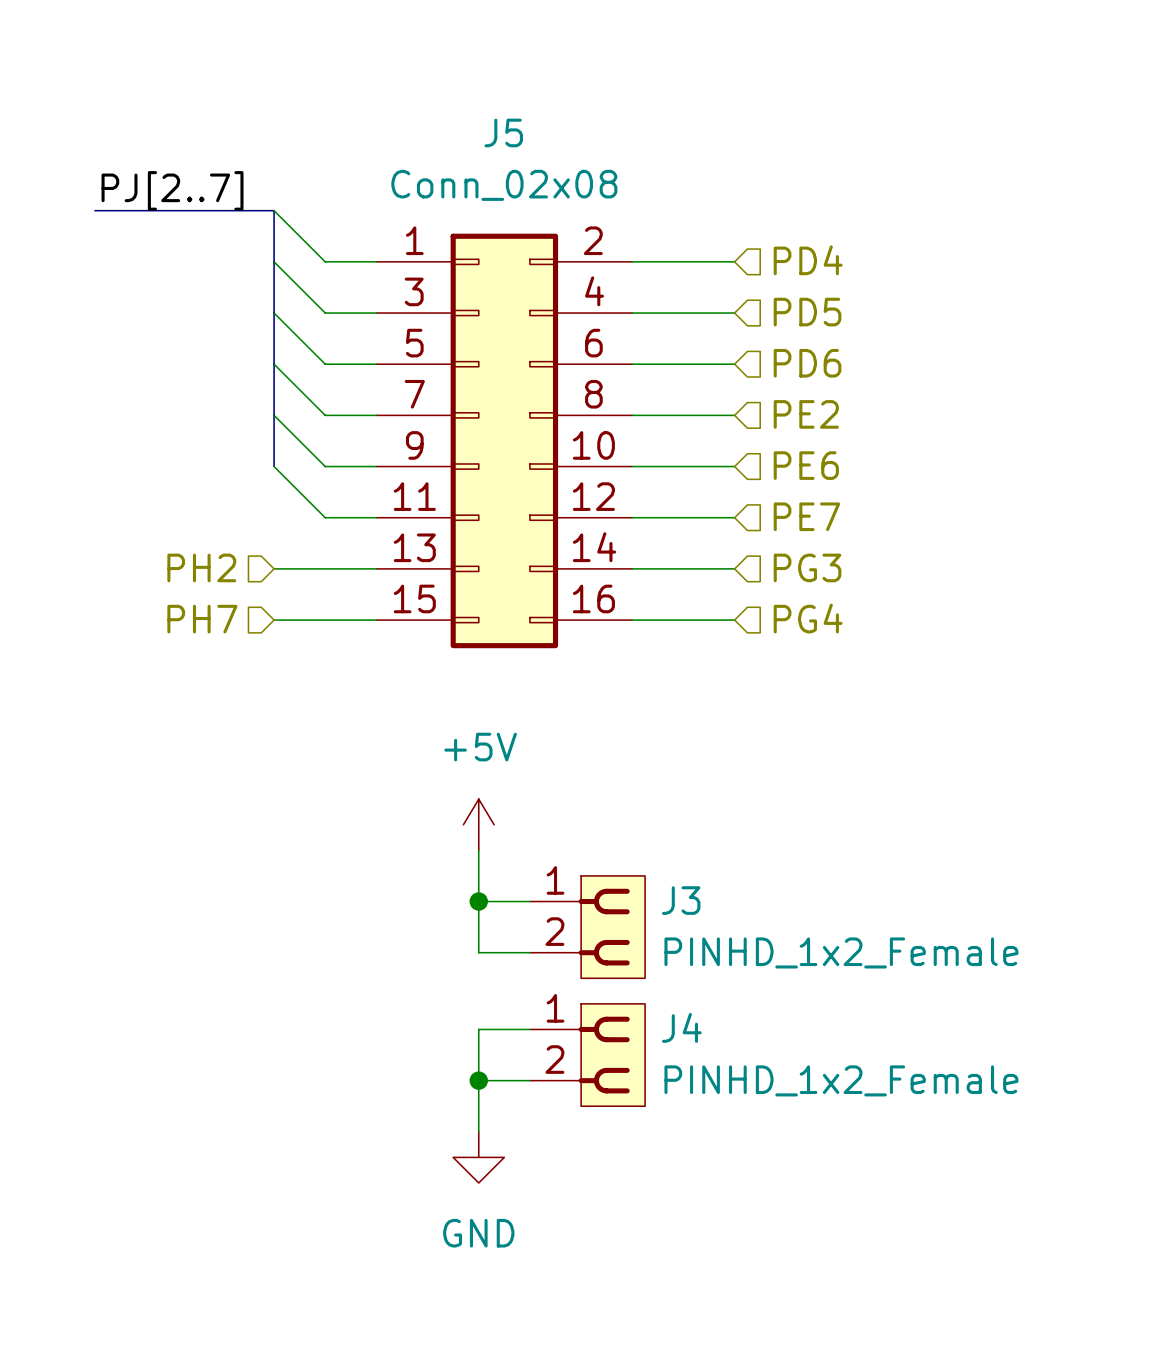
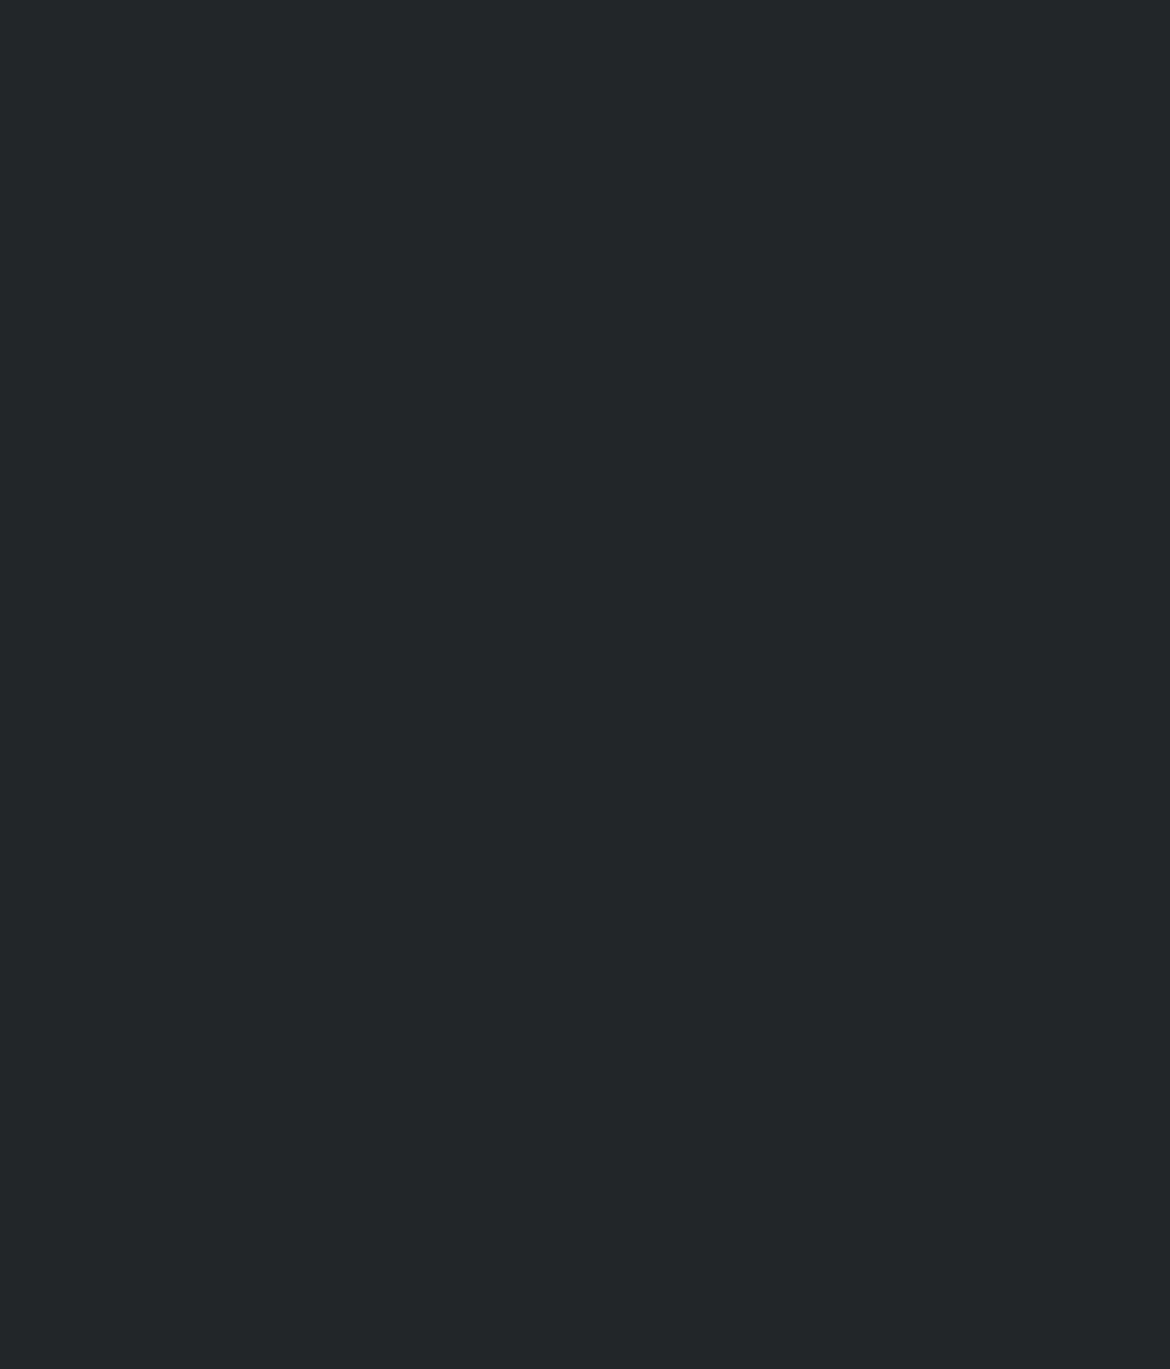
label: PJ[2..7] (172, 190) -> none
bus: (94, 210) (274, 210) (274, 466) -> none
wire: (274, 210) (325, 261) (376, 261) -> none
hierarchical label: PD4 (808, 260) -> none
wire: (274, 261) (325, 313) (376, 313) -> none
wire: (632, 261) (734, 261) -> none
hierarchical label: PD5 (807, 312) -> none
wire: (274, 313) (325, 364) (376, 364) -> none
wire: (632, 313) (734, 313) -> none
hierarchical label: PD6 (807, 363) -> none
wire: (274, 364) (325, 415) (376, 415) -> none
wire: (632, 364) (734, 364) -> none
hierarchical label: PE2 (806, 414) -> none
wire: (274, 415) (325, 466) (376, 466) -> none
wire: (632, 415) (734, 415) -> none
J5: Conn_02x08 (504, 440) -> none
hierarchical label: PE6 (806, 465) -> none
wire: (274, 466) (325, 517) (376, 517) -> none
wire: (632, 466) (734, 466) -> none
hierarchical label: PE7 (806, 516) -> none
wire: (632, 517) (734, 517) -> none
hierarchical label: PH2 (201, 567) -> none
hierarchical label: PG3 (807, 567) -> none
wire: (274, 568) (376, 568) -> none
wire: (632, 568) (734, 568) -> none
hierarchical label: PG4 (808, 618) -> none
hierarchical label: PH7 (202, 619) -> none
wire: (274, 620) (376, 620) -> none
wire: (632, 620) (734, 620) -> none
power symbol: +5V (478, 824) -> none
wire: (478, 850) (478, 952) (529, 952) -> none
wire: (478, 901) (529, 901) -> none
junction: (478, 901) -> none
J3: PINHD_1x2_Female (587, 927) -> none
wire: (529, 1029) (478, 1029) (478, 1131) -> none
J4: PINHD_1x2_Female (587, 1055) -> none
wire: (478, 1080) (529, 1080) -> none
junction: (478, 1080) -> none
power symbol: GND (478, 1157) -> none

